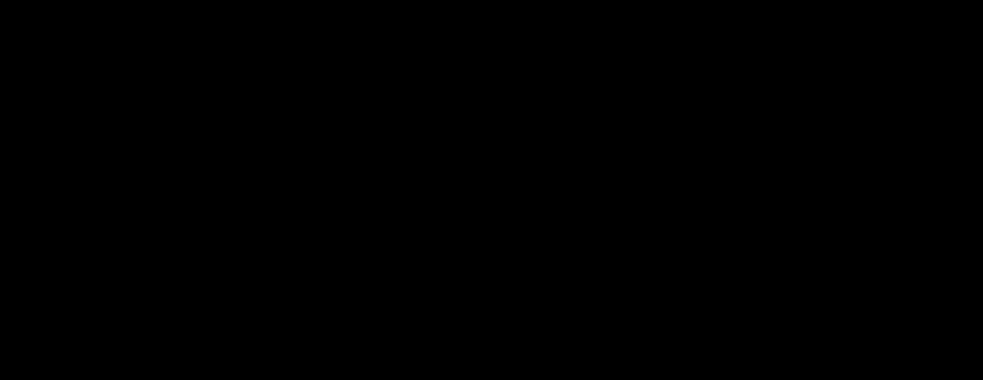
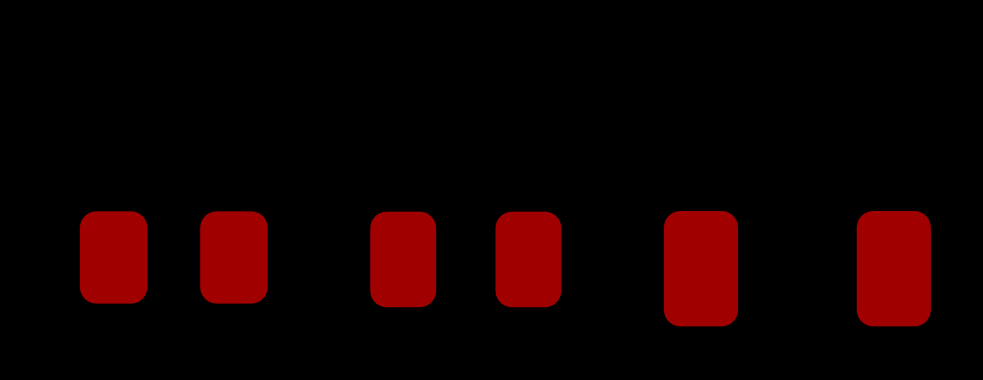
part: none -> (173, 257)
part: none -> (465, 259)
part: none -> (797, 268)

